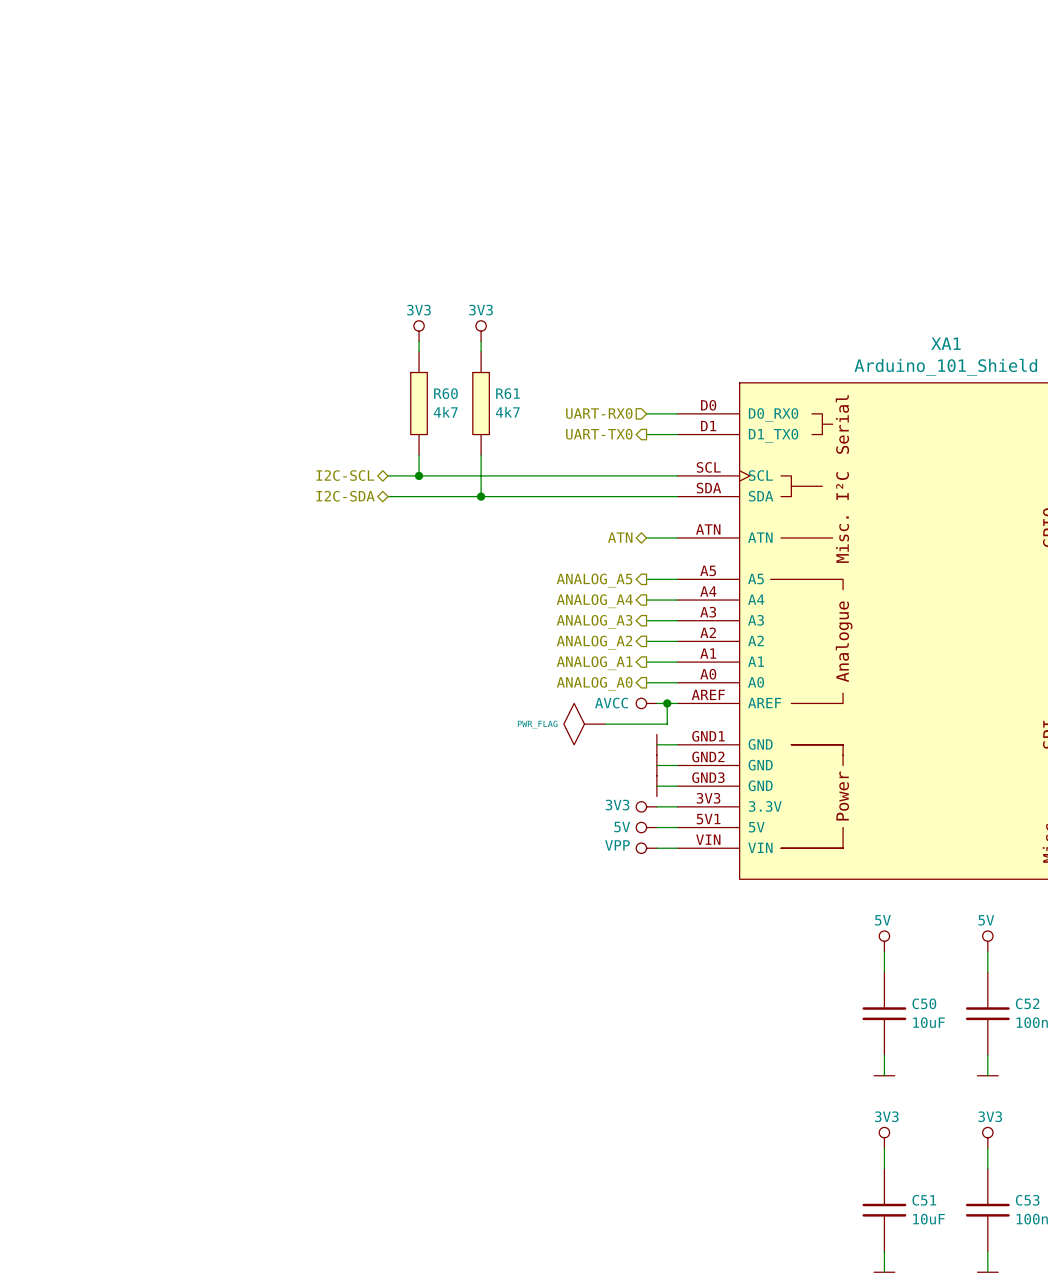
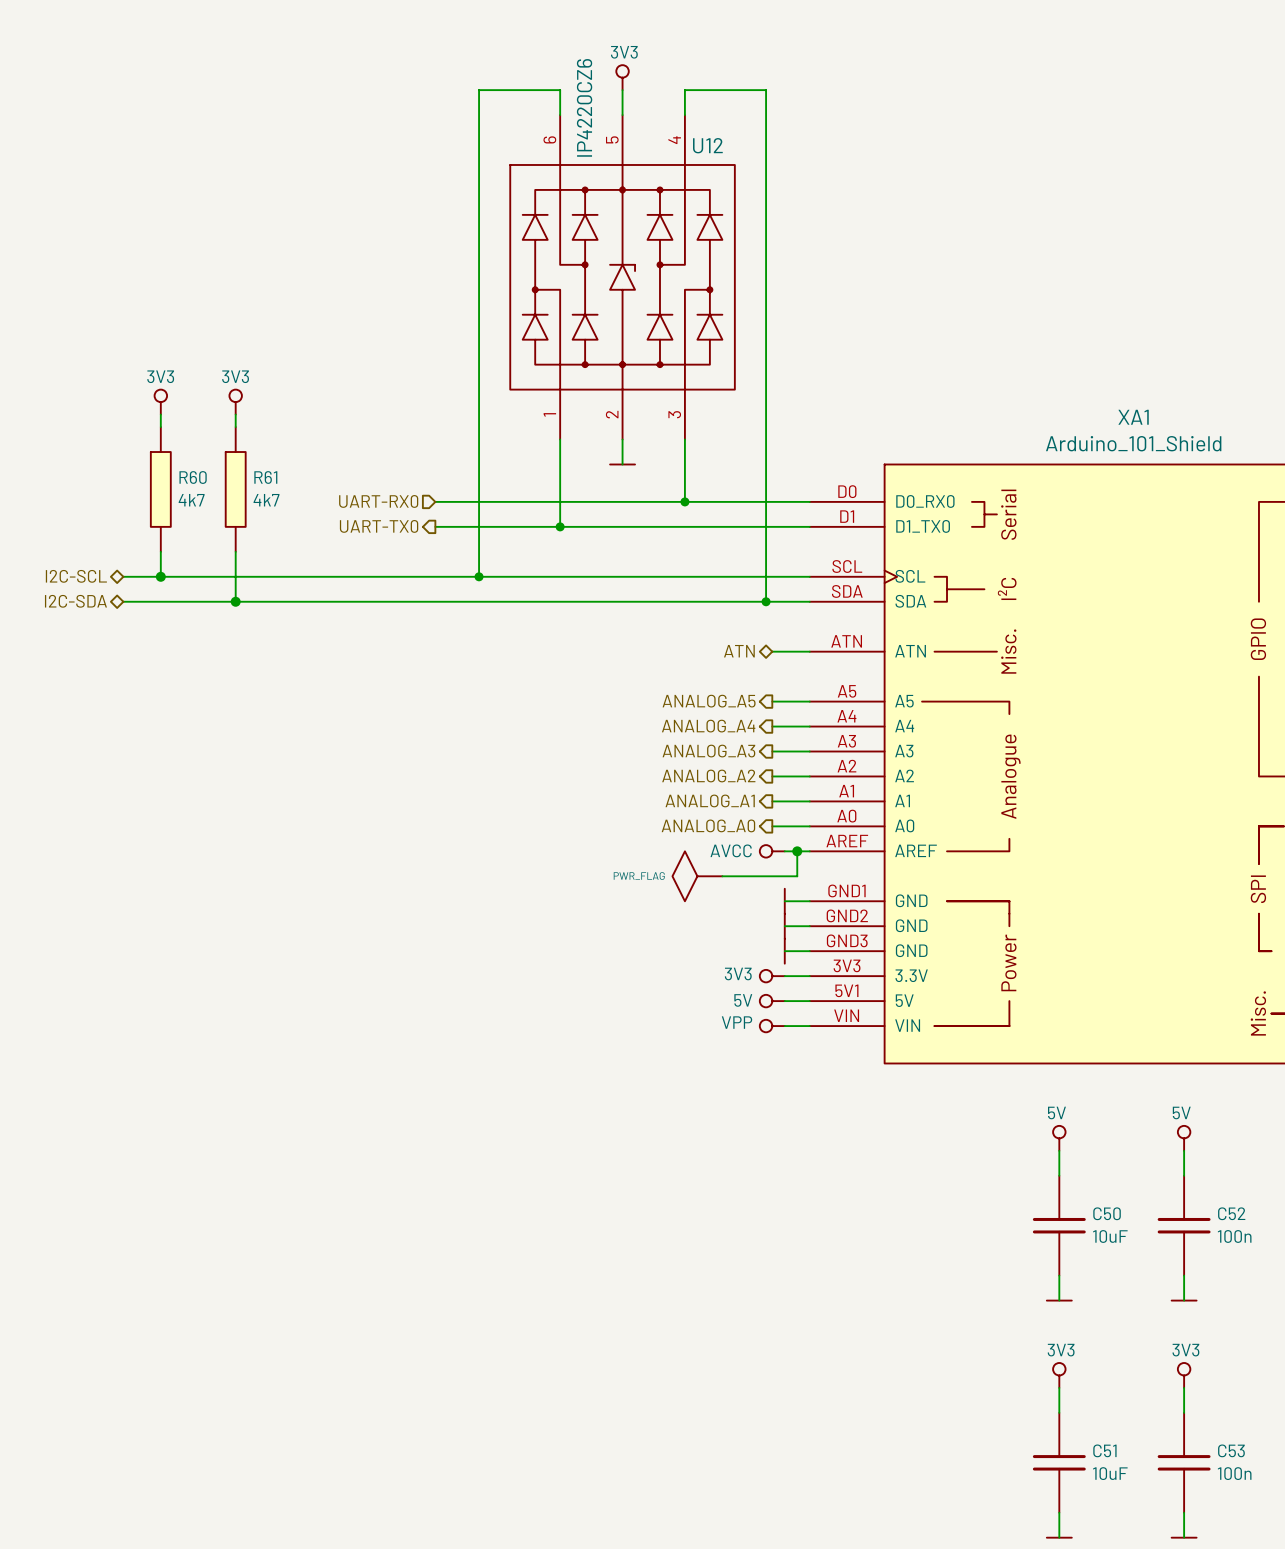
power symbol: none -> 3V3 (622, 77)
wire: none -> (622, 90) (622, 115)
wire: none -> (560, 115) (560, 90) (479, 90) (479, 576)
wire: none -> (684, 115) (684, 90) (766, 90) (766, 601)
U12: none -> IP4220CZ6 (622, 277)
power symbol: none -> 3V3 (160, 402)
power symbol: none -> 3V3 (235, 402)
power symbol: 3V3 (419, 331) -> none
power symbol: 3V3 (481, 331) -> none
wire: none -> (160, 414) (160, 427)
wire: none -> (235, 414) (235, 427)
wire: (419, 341) (419, 351) -> none
wire: (481, 341) (481, 351) -> none
wire: none -> (560, 439) (560, 526)
wire: none -> (684, 439) (684, 501)
power symbol: none -> (622, 464)
R60 position: (419, 403) -> (160, 489)
R61 position: (481, 403) -> (235, 489)
hierarchical label: none -> UART-RX0 (378, 501)
wire: none -> (435, 501) (772, 501)
junction: none -> (684, 501)
hierarchical label: UART-RX0 (599, 413) -> none
hierarchical label: none -> UART-TX0 (379, 526)
wire: none -> (435, 526) (772, 526)
junction: none -> (560, 526)
hierarchical label: UART-TX0 (599, 434) -> none
wire: none -> (160, 551) (160, 576)
wire: none -> (235, 551) (235, 601)
wire: (419, 455) (419, 475) -> (622, 439) (622, 464)
wire: (481, 455) (481, 496) -> none
hierarchical label: none -> I2C-SCL (76, 576)
wire: none -> (123, 576) (460, 576)
junction: none -> (160, 576)
hierarchical label: I2C-SCL (345, 475) -> none
junction: none -> (479, 576)
junction: (419, 475) -> none
hierarchical label: none -> I2C-SDA (75, 601)
wire: none -> (123, 601) (460, 601)
junction: none -> (235, 601)
hierarchical label: I2C-SDA (345, 496) -> none
junction: (481, 496) -> none
junction: none -> (766, 601)

